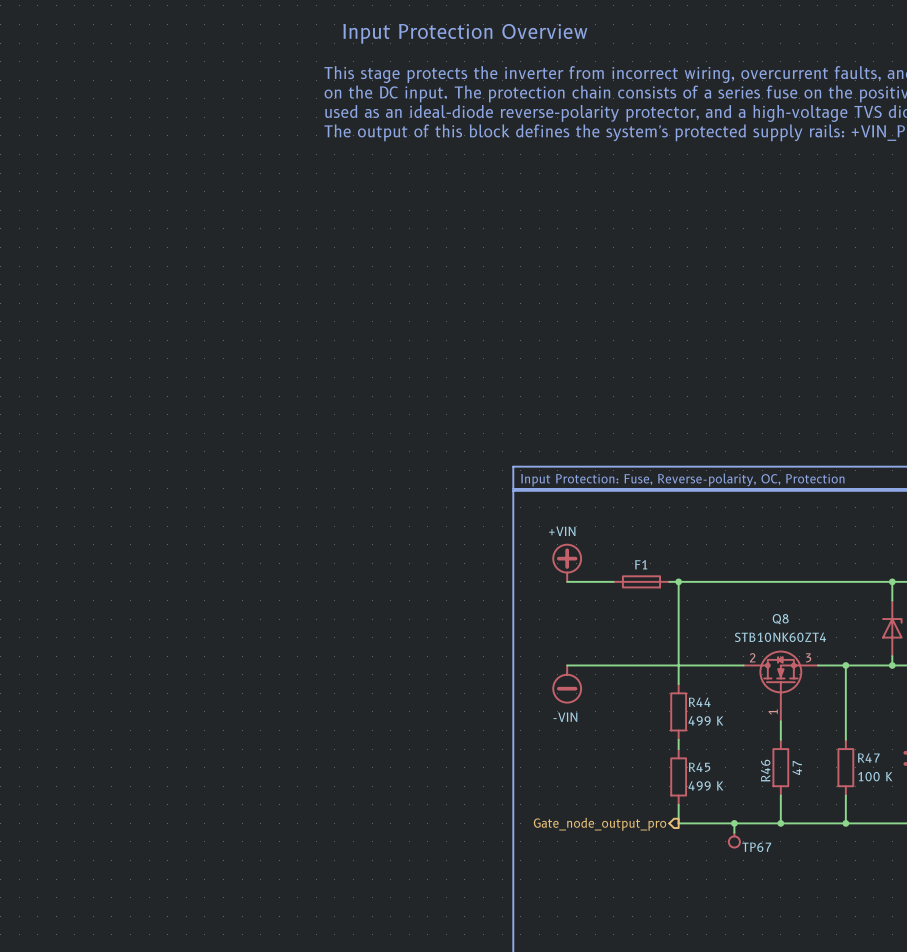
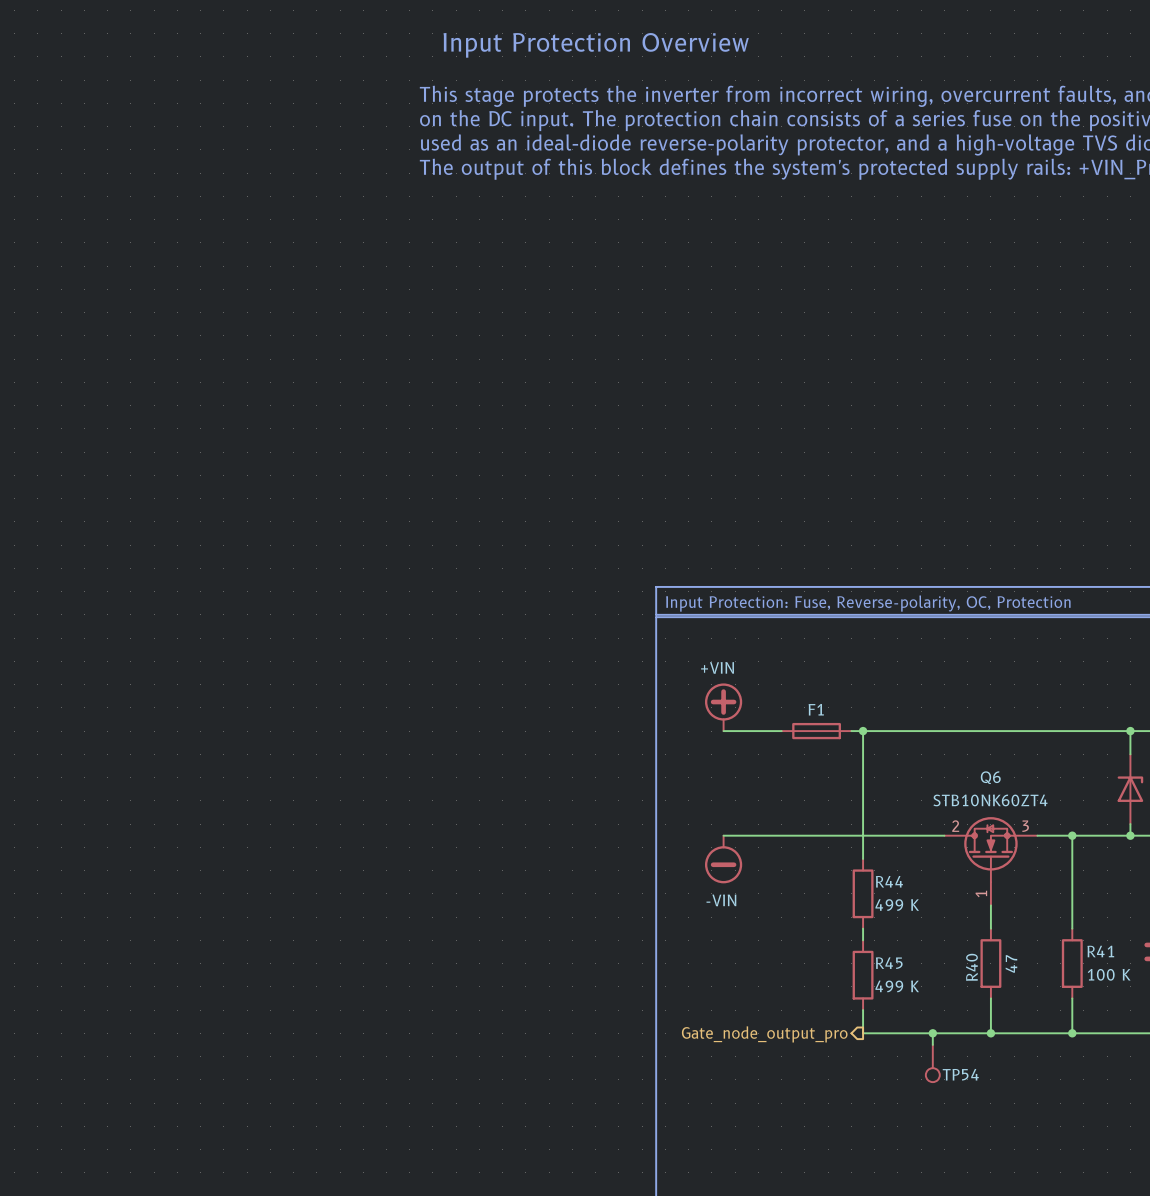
Q8 name: Q8 (780, 619) -> Q6 (990, 777)
R47 name: R47 (868, 758) -> R41 (1100, 951)
R46 name: R46 (765, 770) -> R40 (971, 967)
TP67: (734, 840) -> none
TP54: none -> (932, 1063)

